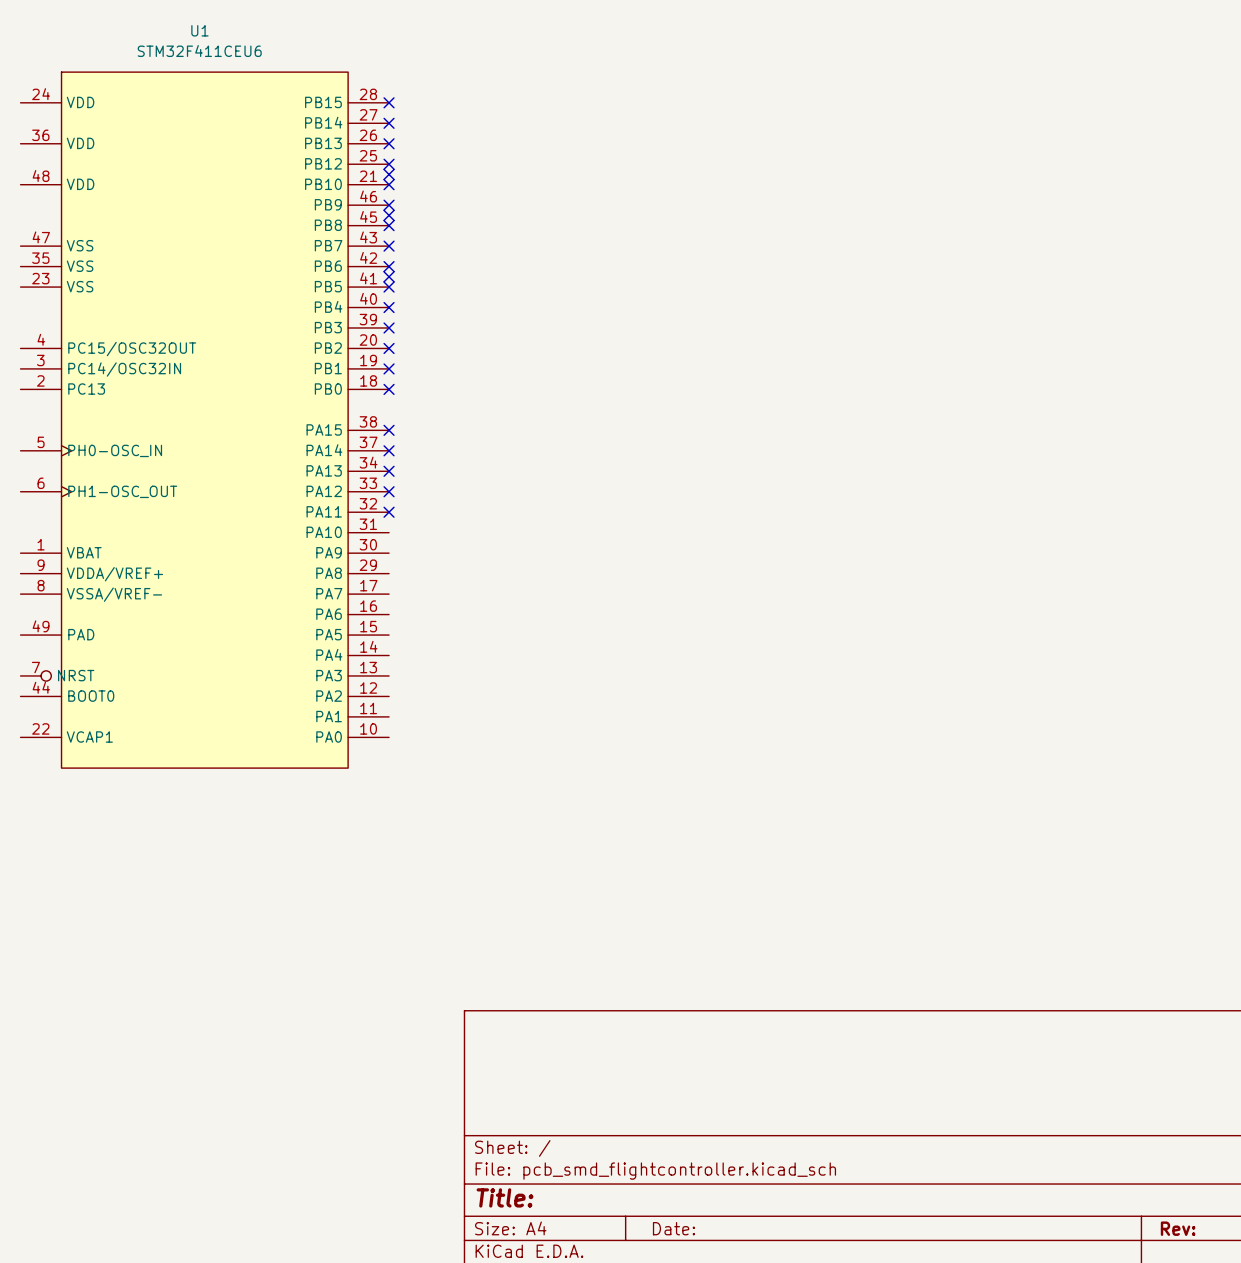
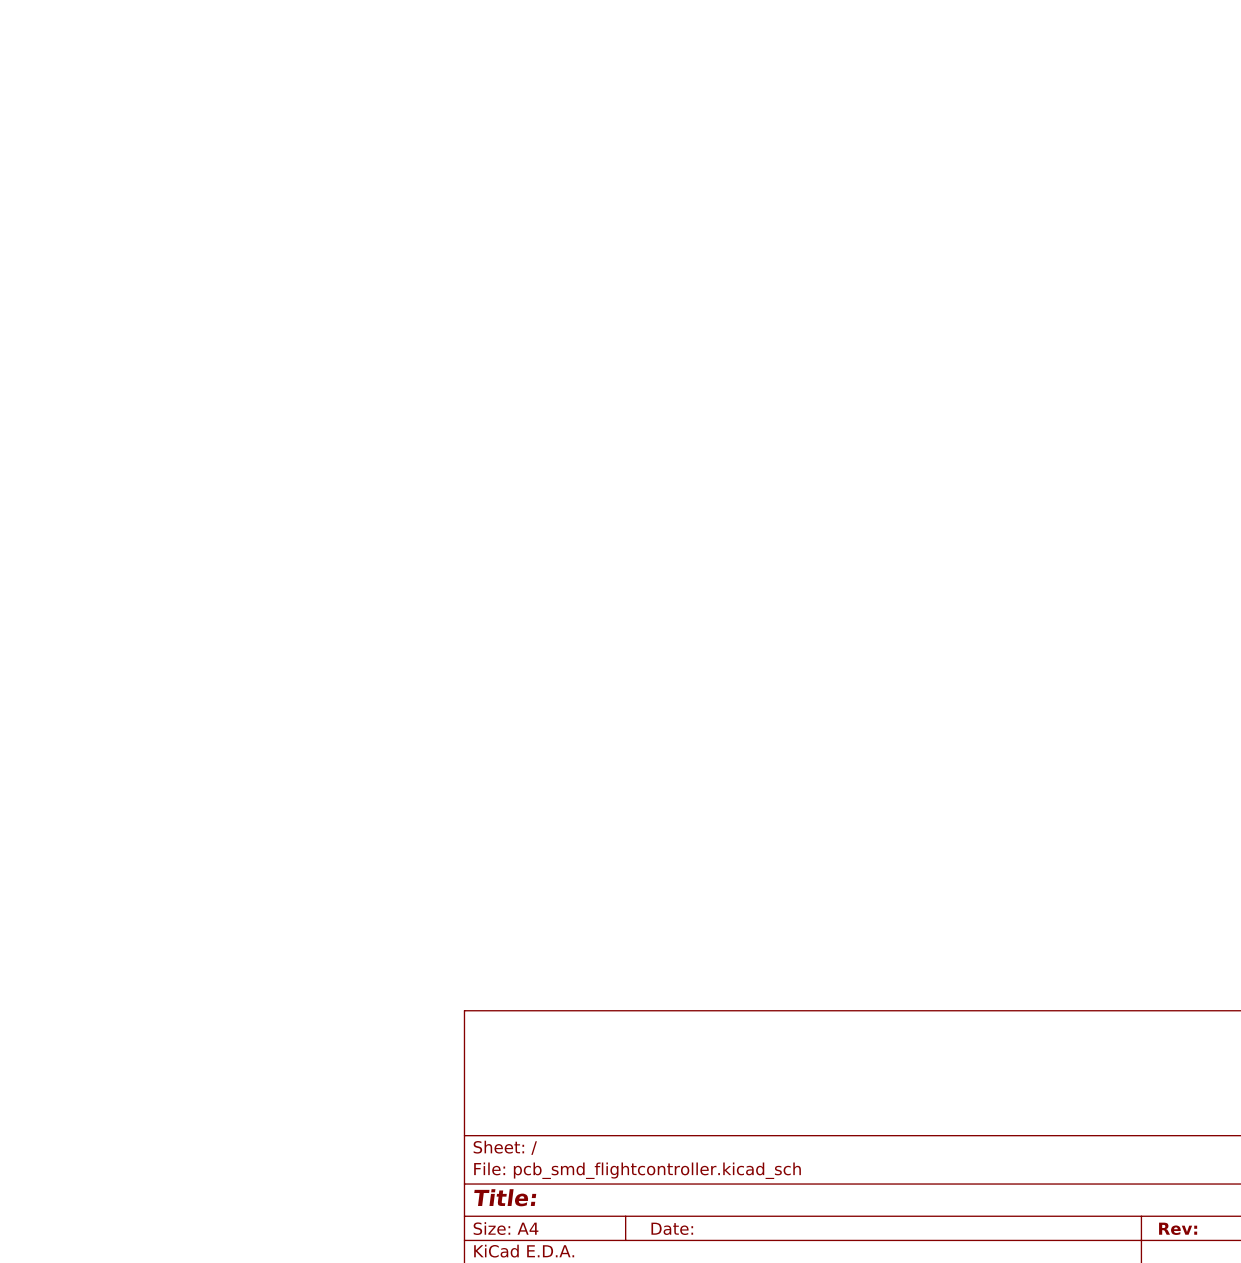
no-connect mark: (389, 102) -> none
no-connect mark: (389, 123) -> none
no-connect mark: (389, 143) -> none
no-connect mark: (389, 164) -> none
no-connect mark: (389, 174) -> none
no-connect mark: (389, 184) -> none
no-connect mark: (389, 205) -> none
no-connect mark: (389, 215) -> none
no-connect mark: (389, 225) -> none
no-connect mark: (389, 246) -> none
no-connect mark: (389, 266) -> none
no-connect mark: (389, 276) -> none
no-connect mark: (389, 287) -> none
no-connect mark: (389, 307) -> none
no-connect mark: (389, 327) -> none
no-connect mark: (389, 348) -> none
no-connect mark: (389, 368) -> none
no-connect mark: (389, 389) -> none
U1: STM32F411CEU6 (204, 420) -> none
no-connect mark: (389, 430) -> none
no-connect mark: (389, 450) -> none
no-connect mark: (389, 471) -> none
no-connect mark: (389, 491) -> none
no-connect mark: (389, 512) -> none

